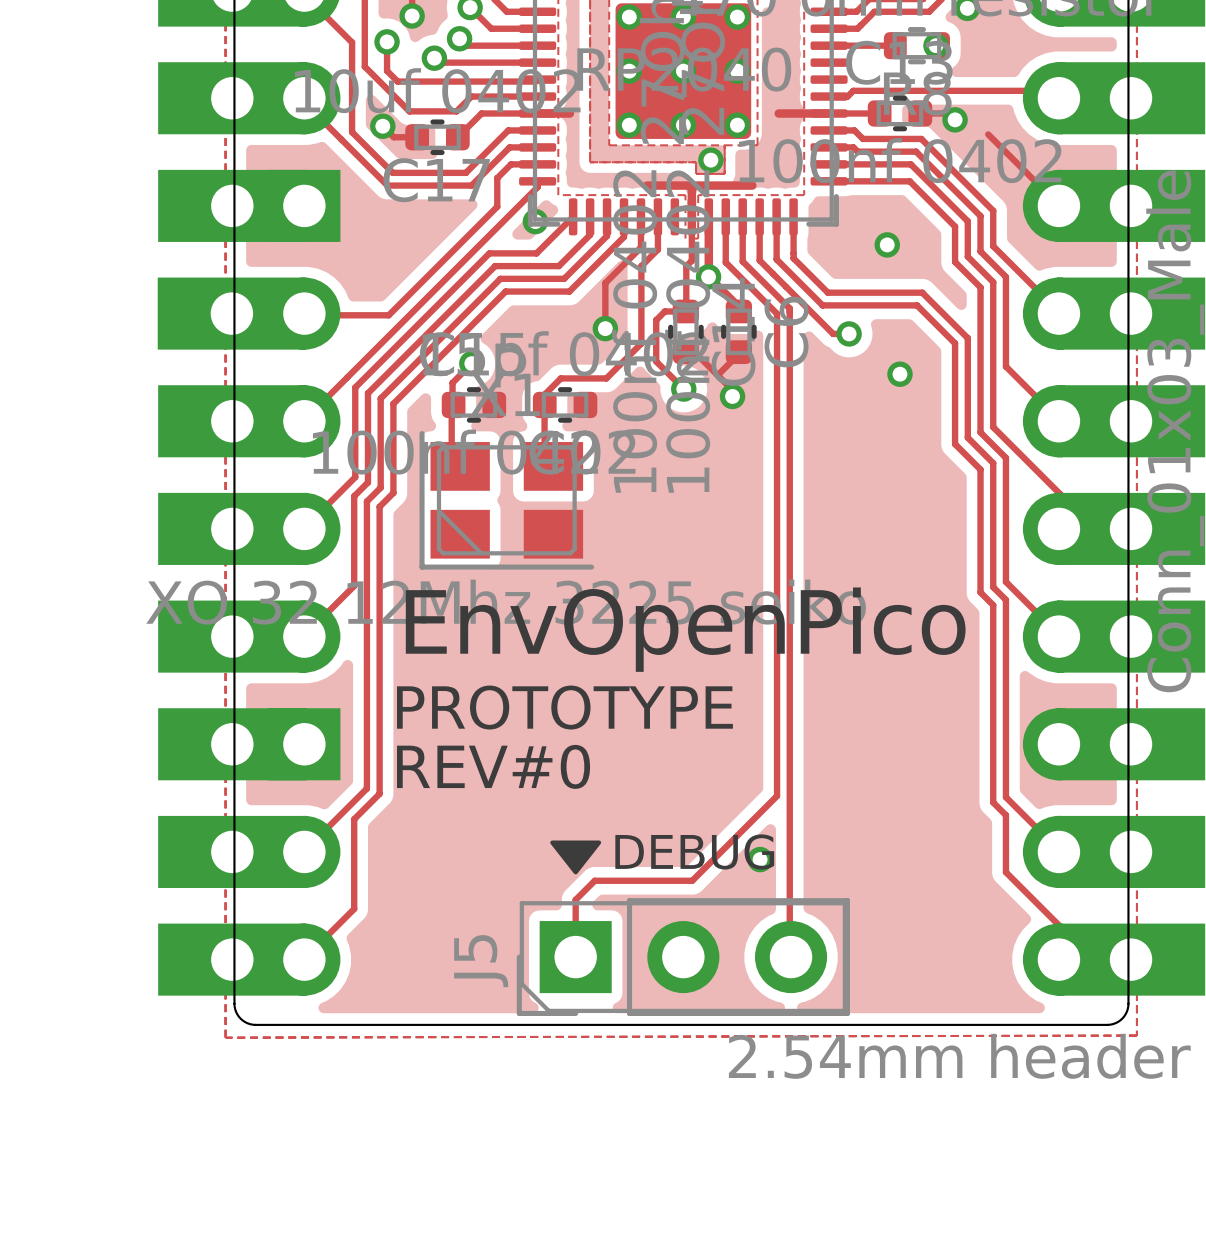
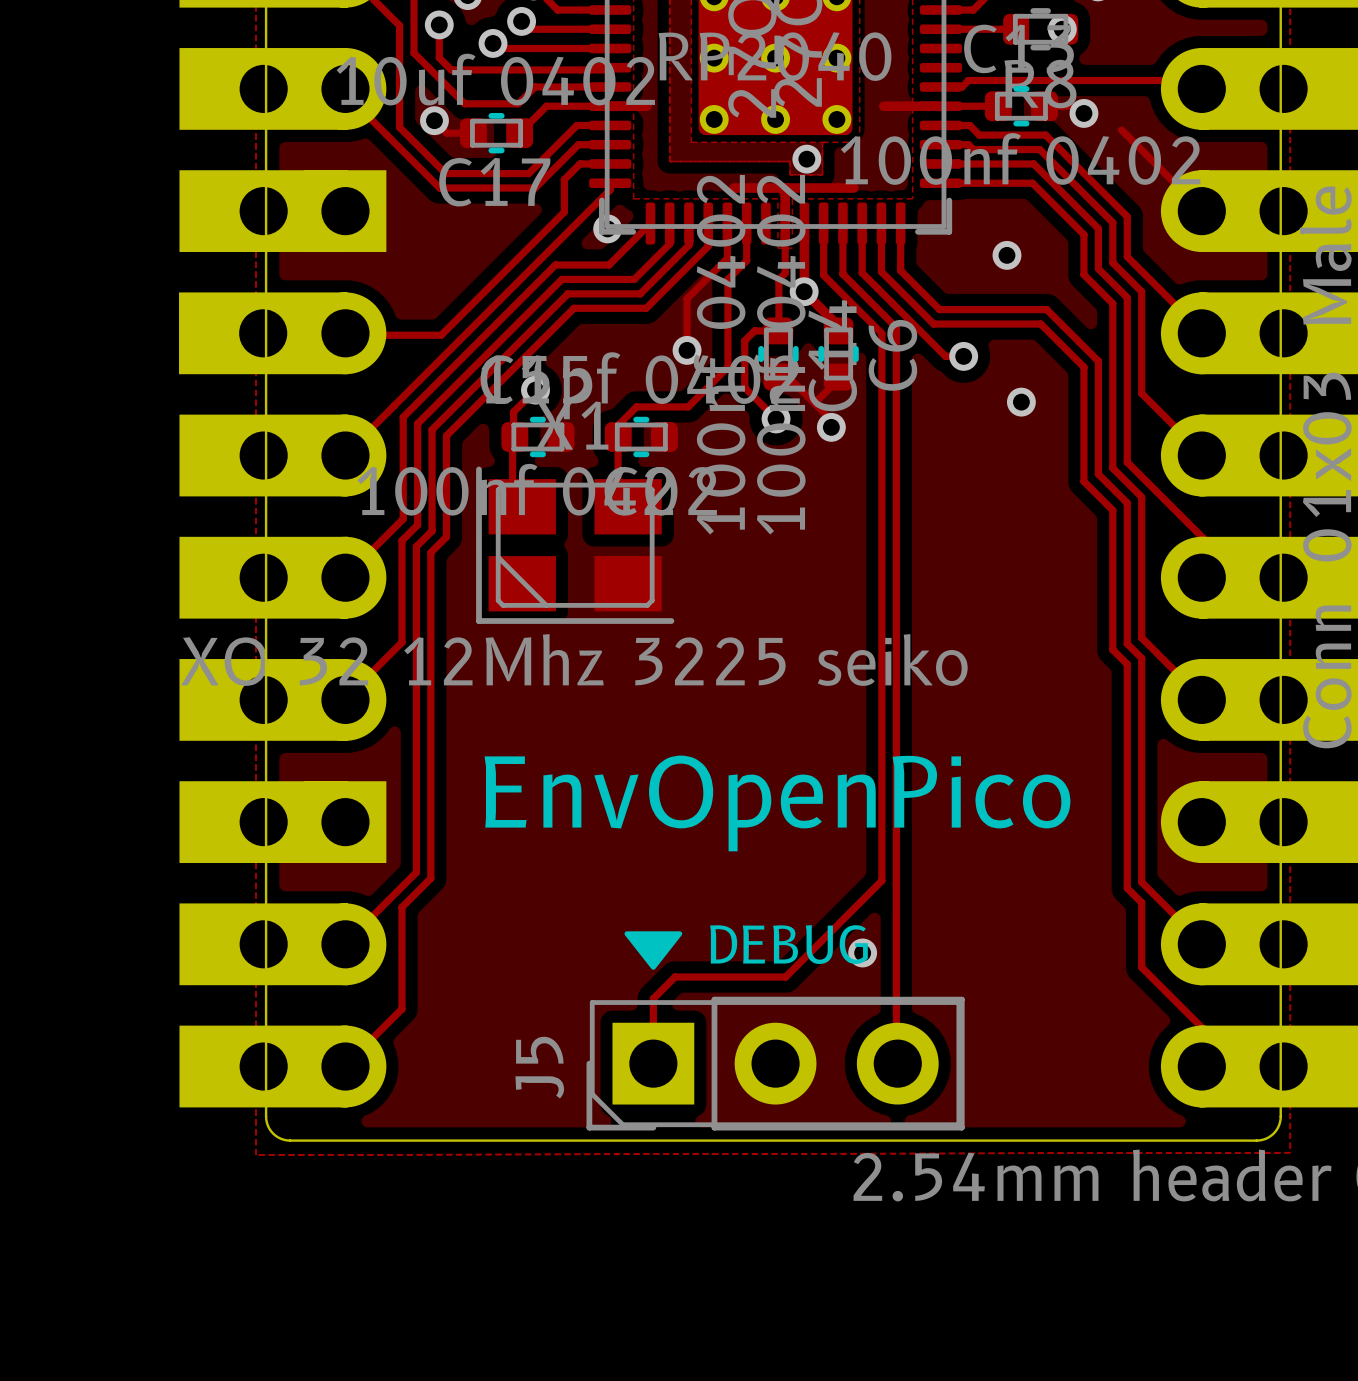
text position: EnvOpenPico (685, 629) -> EnvOpenPico (777, 803)
text: PROTOTYPE (564, 707) -> none
text: REV#0 (493, 766) -> none

